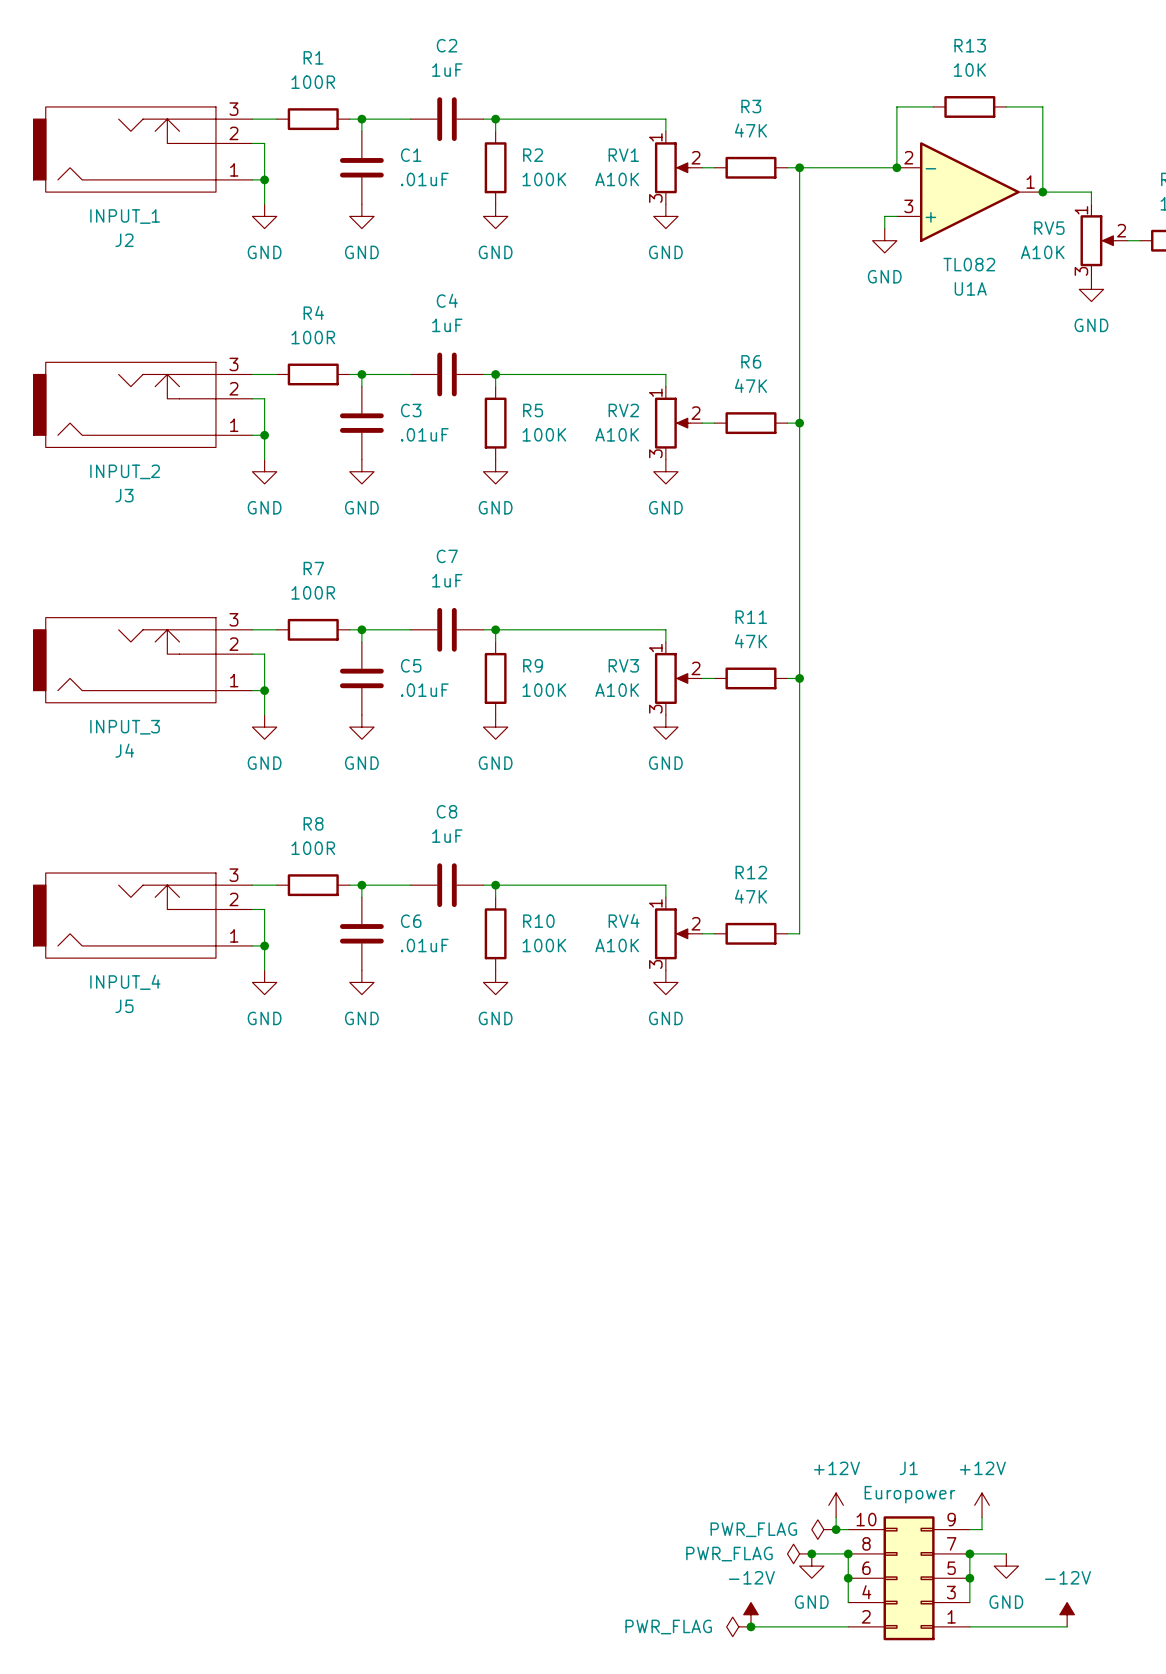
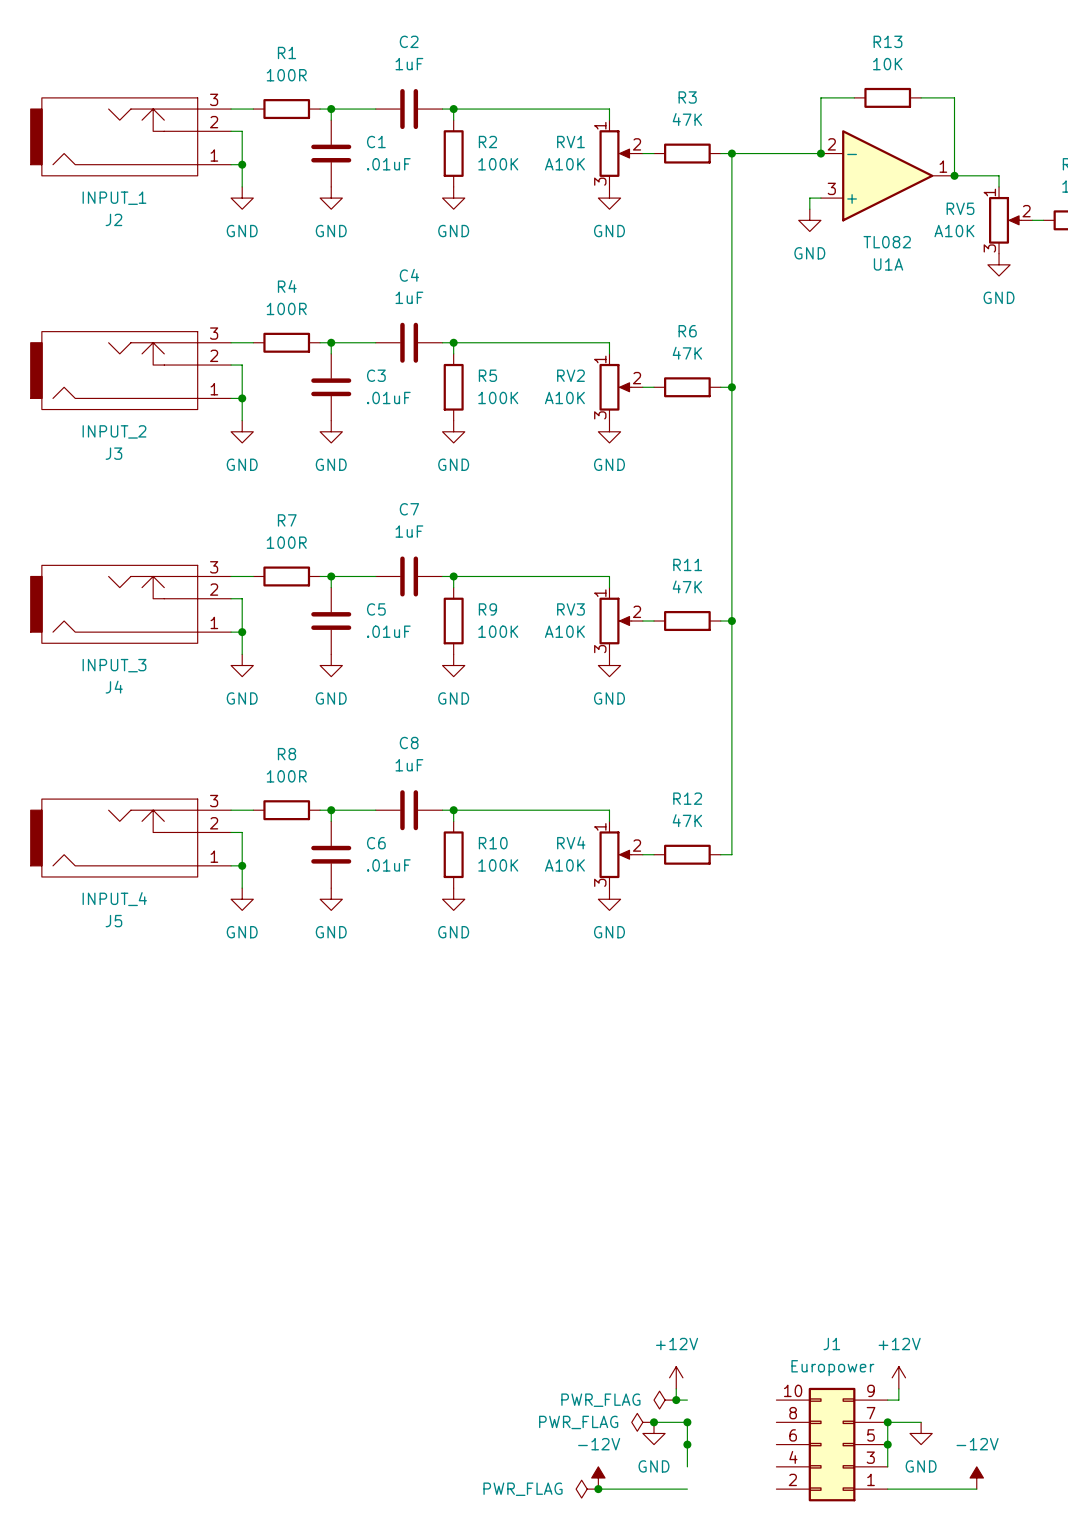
power symbol position: +12V (836, 1505) -> +12V (676, 1377)
wire: (836, 1517) (836, 1529) (848, 1529) -> (676, 1388) (676, 1400) (687, 1400)
power symbol: none -> PWR_FLAG (665, 1400)
junction: none -> (676, 1400)
power symbol: PWR_FLAG (823, 1529) -> none
junction: (836, 1529) -> none
power symbol: none -> PWR_FLAG (642, 1422)
junction: none -> (654, 1422)
junction: none -> (687, 1422)
power symbol: PWR_FLAG (799, 1553) -> none
wire: (811, 1553) (848, 1553) (848, 1602) -> (654, 1422) (687, 1422) (687, 1466)
junction: (811, 1553) -> none
junction: (848, 1553) -> none
power symbol position: GND (811, 1566) -> GND (654, 1433)
junction: none -> (687, 1444)
junction: (848, 1578) -> none
power symbol position: -12V (750, 1614) -> -12V (598, 1477)
power symbol: none -> PWR_FLAG (587, 1489)
junction: none -> (598, 1489)
power symbol: PWR_FLAG (738, 1626) -> none
wire: (750, 1626) (848, 1626) -> (687, 1489) (598, 1489)
junction: (750, 1626) -> none

